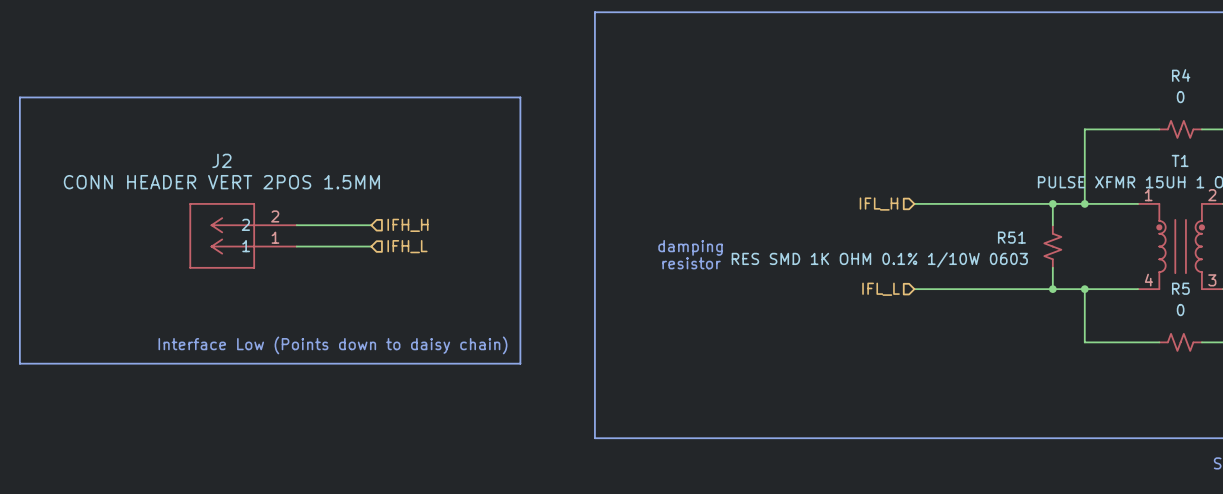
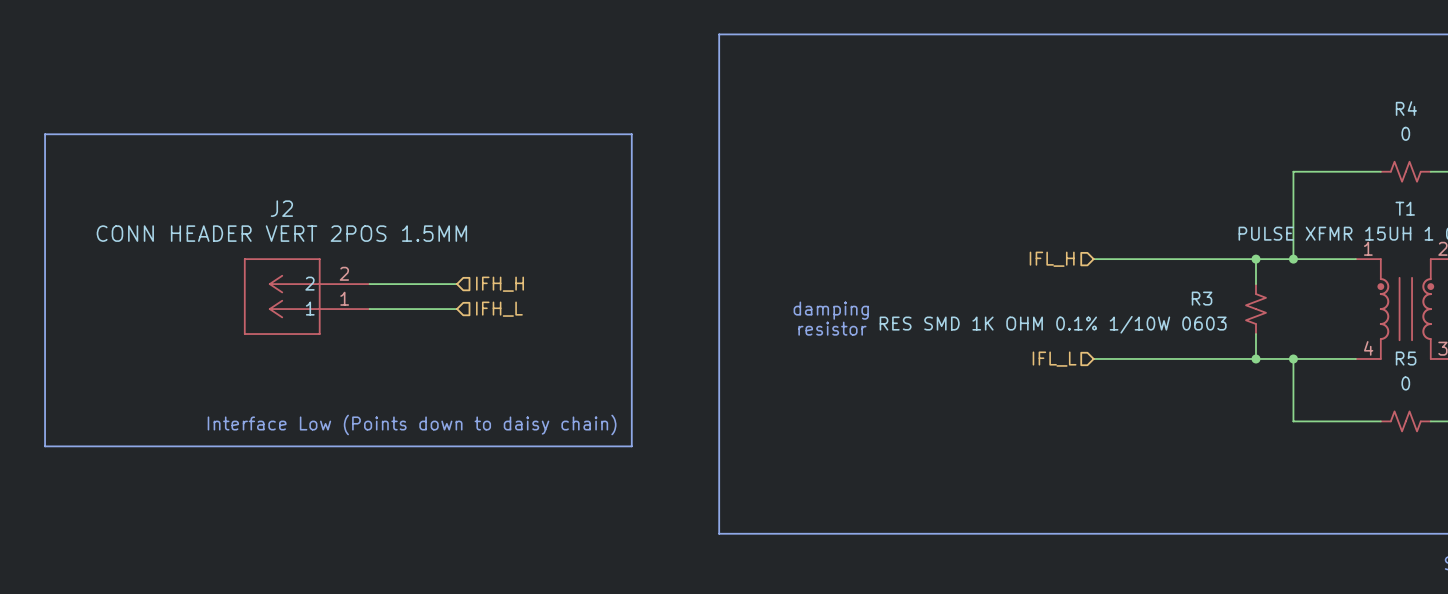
R51 name: R51 (1011, 237) -> R3 (1202, 298)

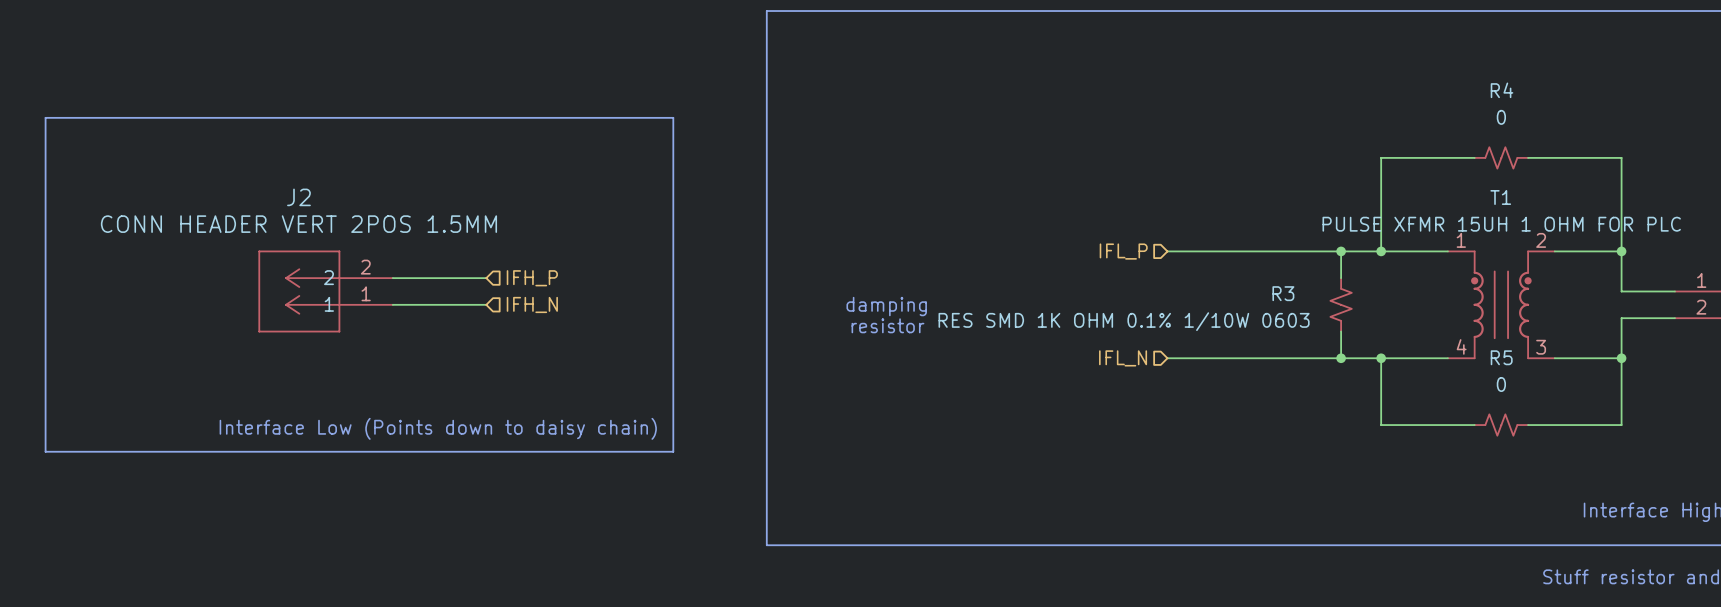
hierarchical label: IFL_H (1052, 259) -> IFL_P (1123, 251)
hierarchical label: IFH_H (500, 284) -> IFH_P (532, 278)
hierarchical label: IFH_L (499, 309) -> IFH_N (532, 304)
hierarchical label: IFL_L (1054, 359) -> IFL_N (1123, 358)

